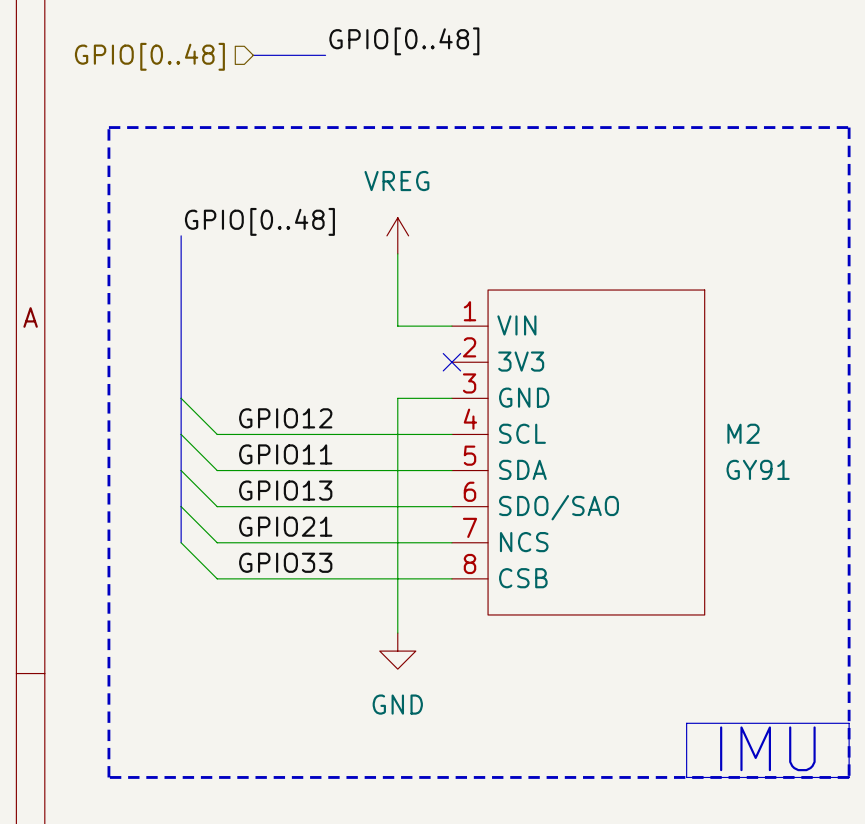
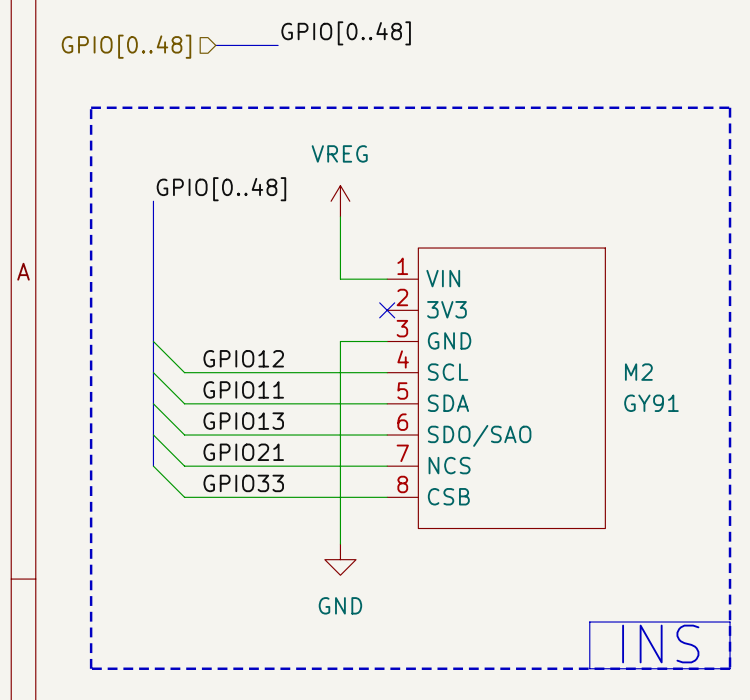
text: IMU (767, 748) -> INS (660, 644)

